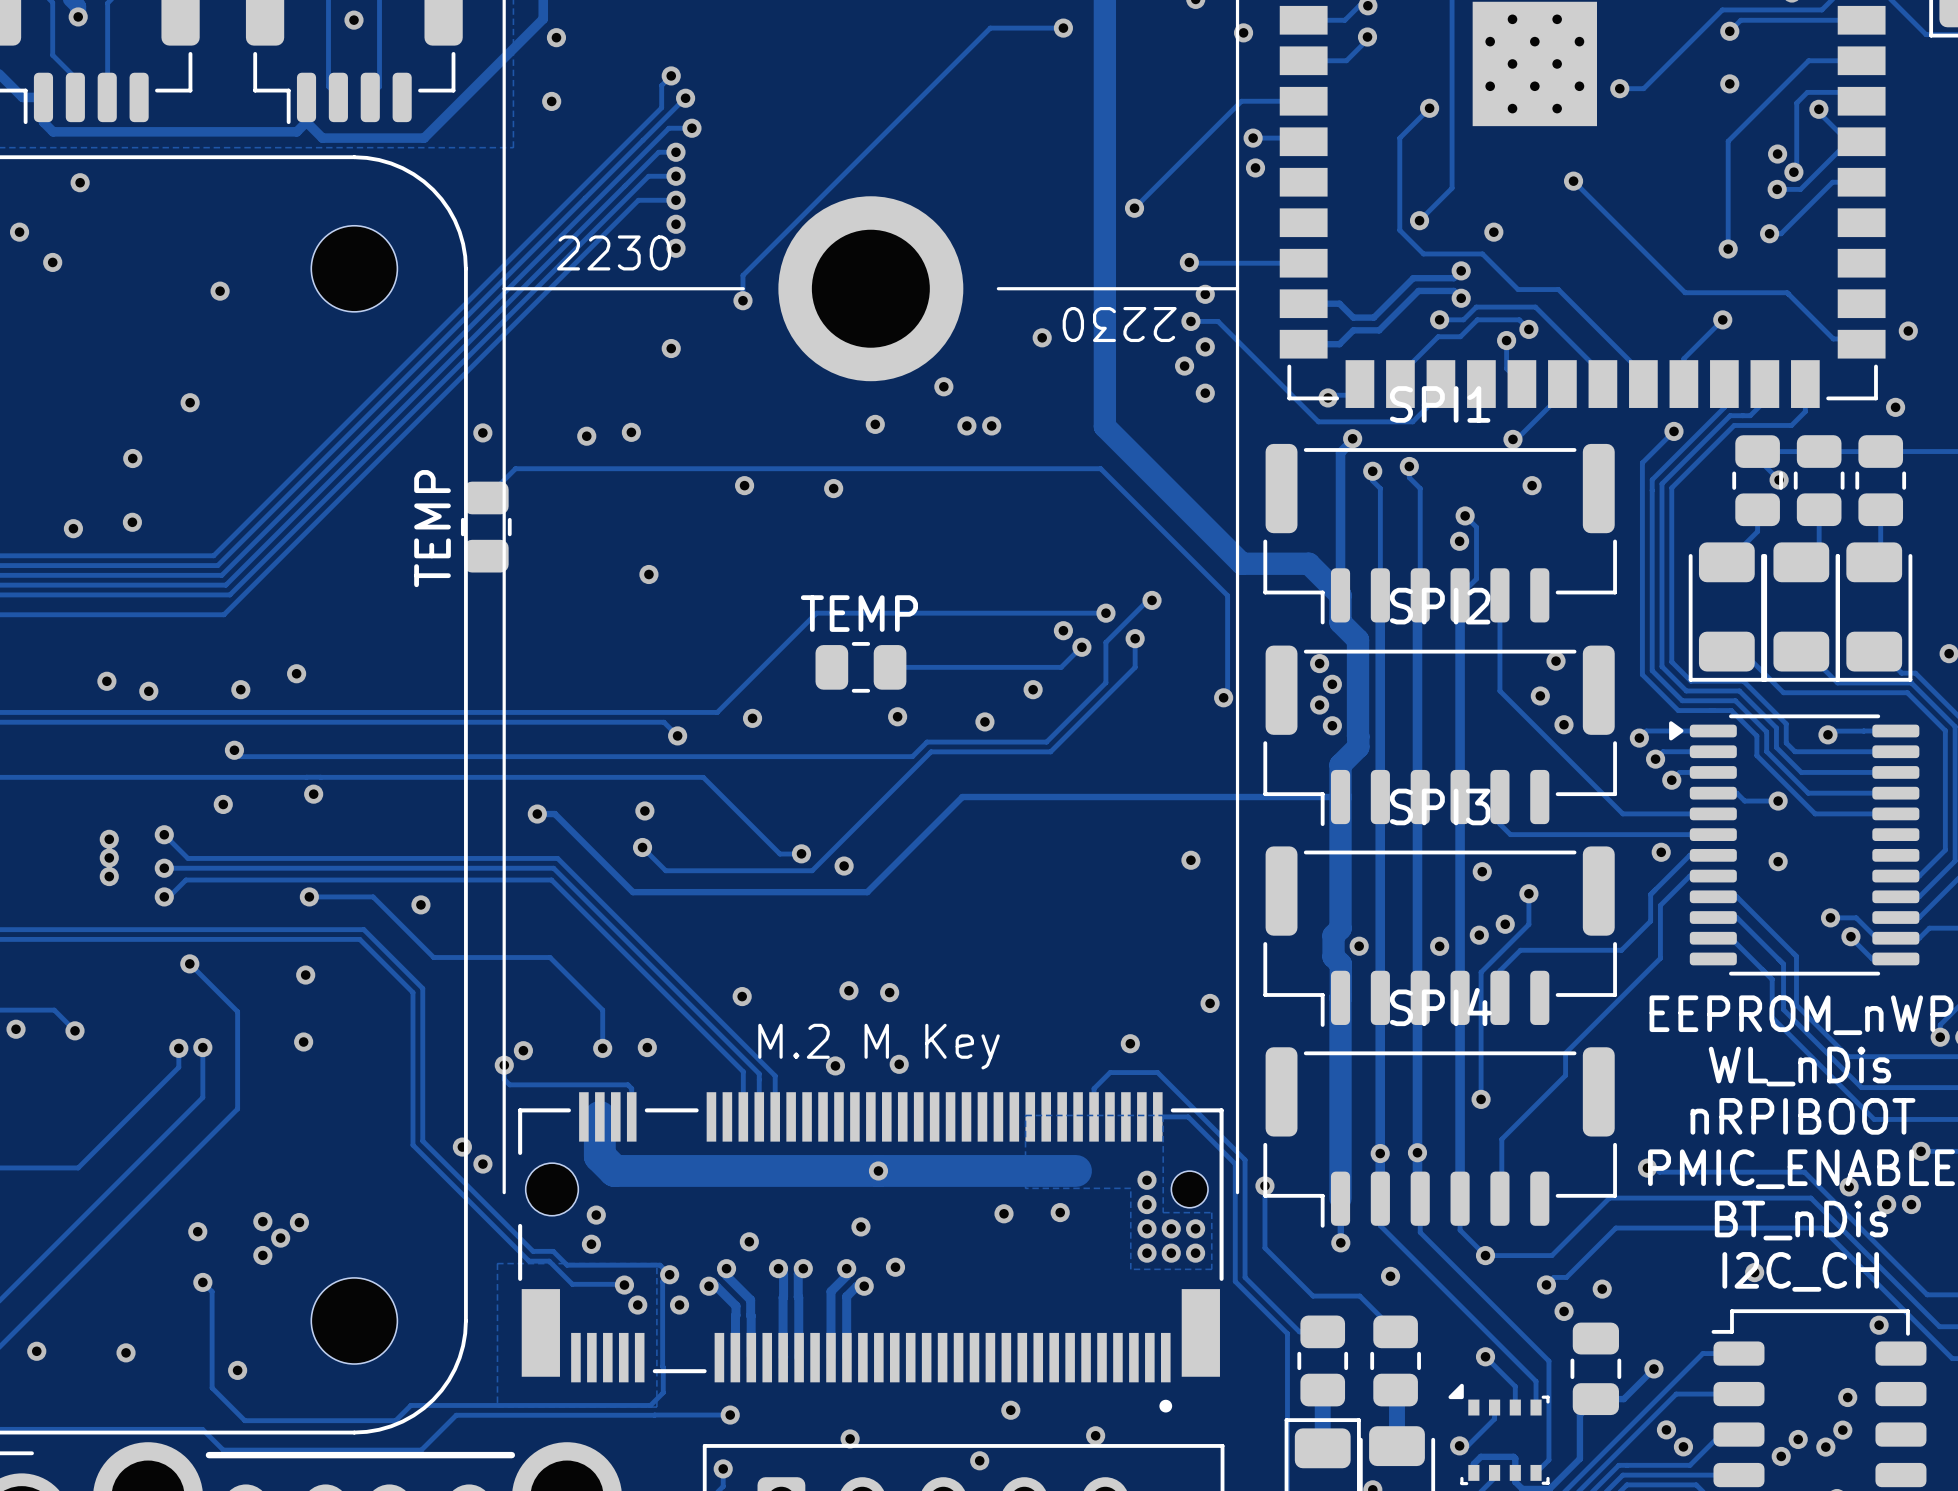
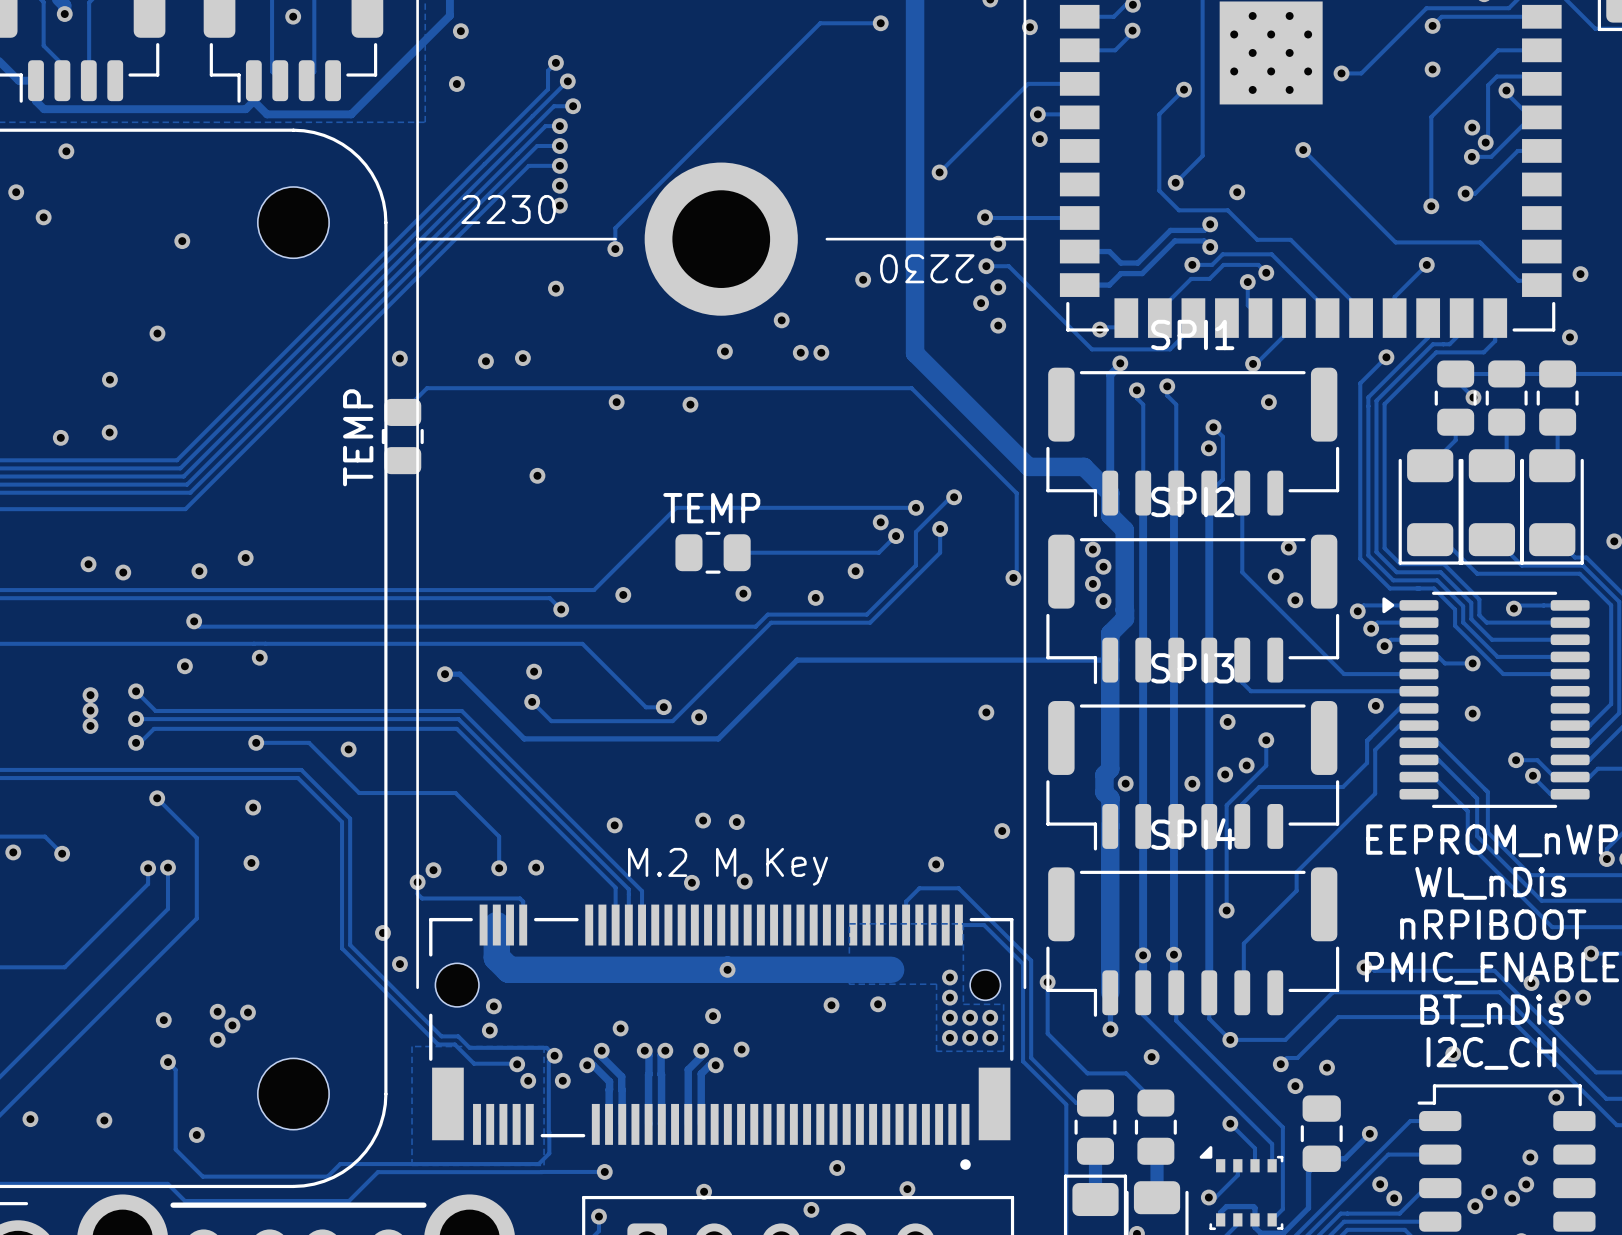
via position: (462, 1147) -> (382, 932)

